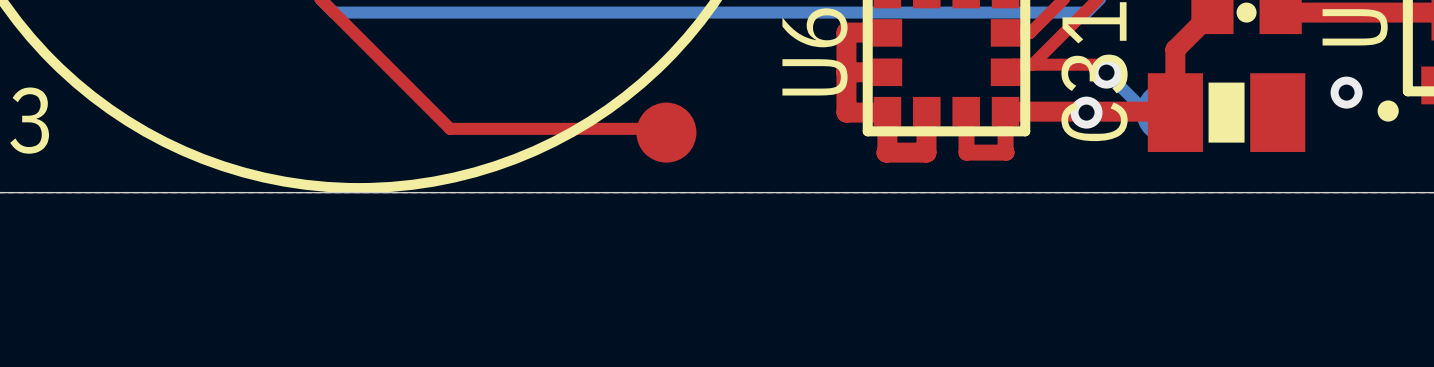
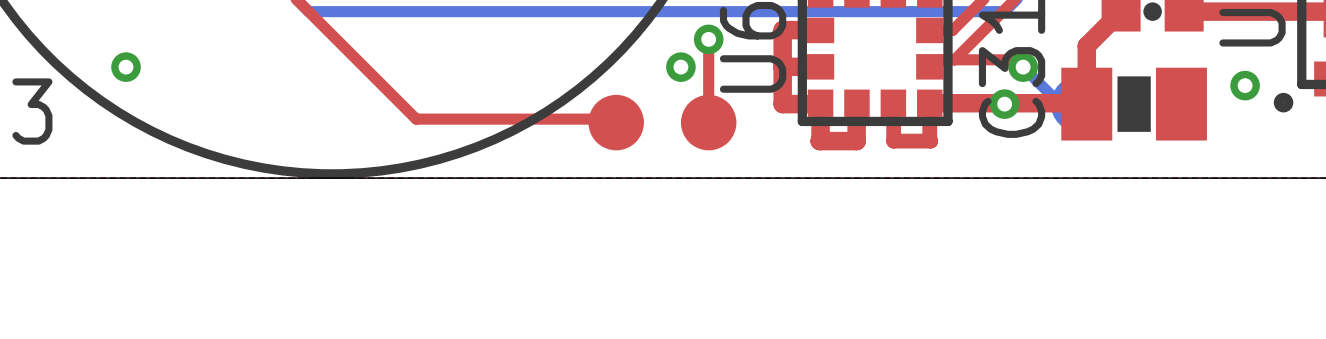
top track: none -> (708, 39) (708, 122)
via: none -> (708, 39)
via: none -> (126, 67)
via: none -> (680, 67)
part: none -> (708, 122)

